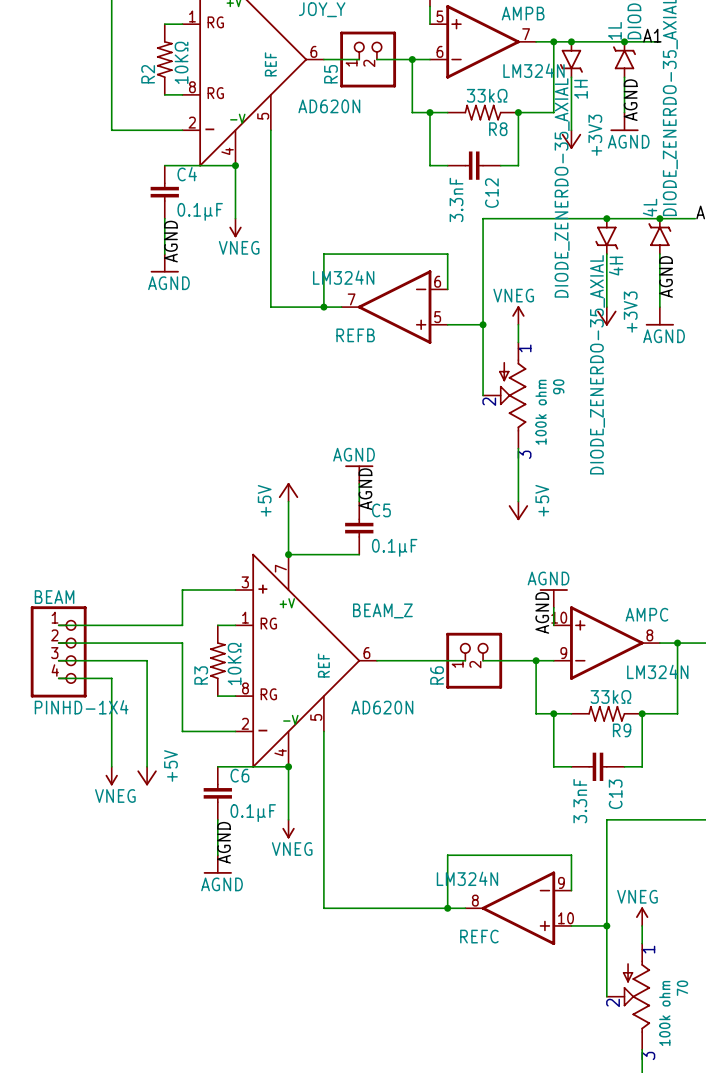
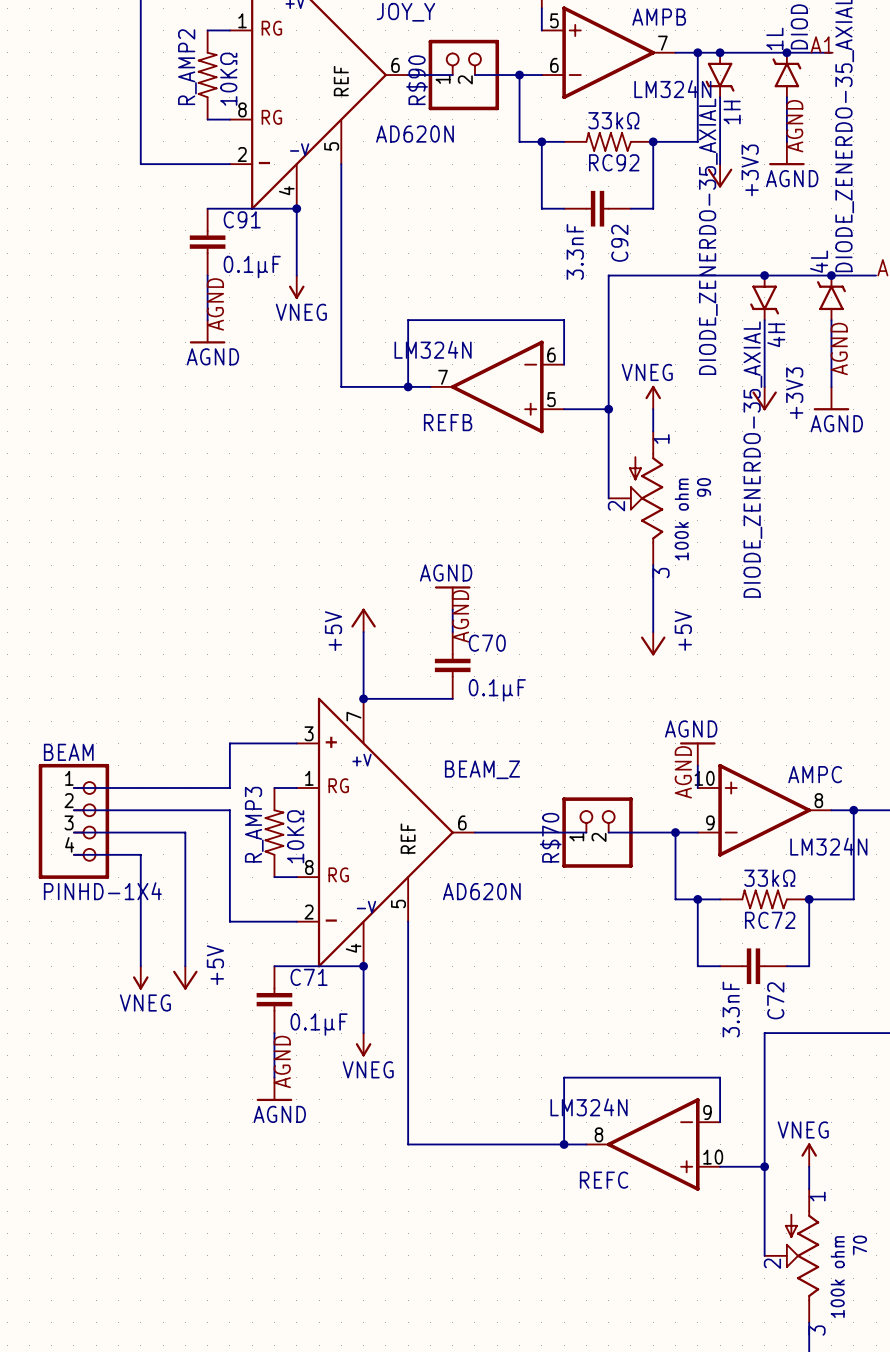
R2 name: R2 (148, 74) -> R_AMP2 (187, 67)
R5 name: R5 (330, 74) -> R$90 (417, 80)
R8 name: R8 (498, 129) -> RC92 (614, 162)
C4 name: C4 (187, 174) -> C91 (242, 219)
C12 name: C12 (491, 193) -> C92 (619, 243)
C5 name: C5 (381, 510) -> C70 (487, 643)
R3 name: R3 (201, 675) -> R_AMP3 (254, 824)
R6 name: R6 (437, 675) -> R$70 (550, 837)
R9 name: R9 (622, 730) -> RC72 (770, 920)
C6 name: C6 (239, 775) -> C71 (309, 977)
C13 name: C13 (615, 794) -> C72 (775, 1000)

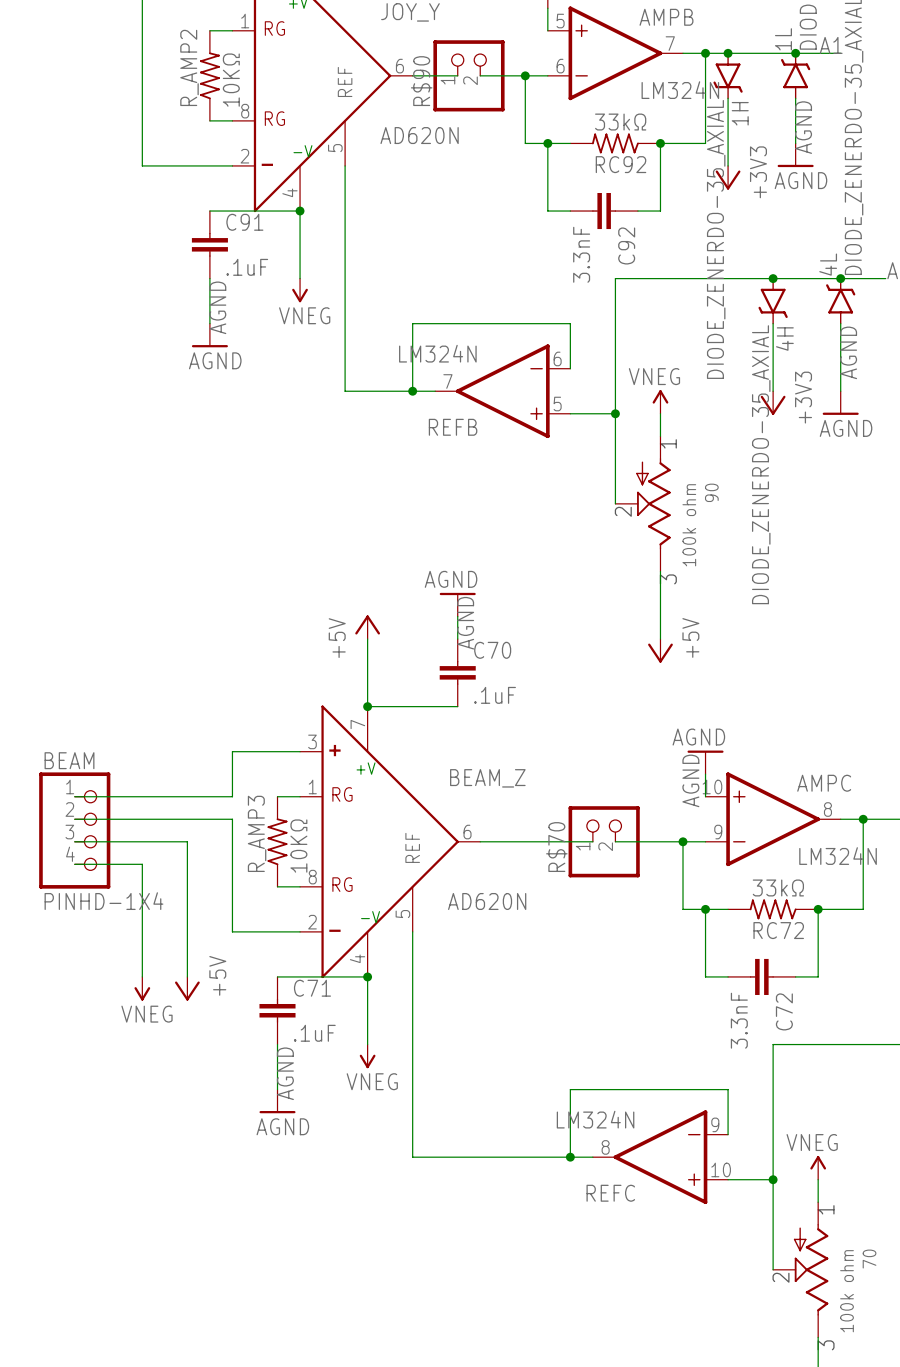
C91 value: 0.1µF (252, 267) -> .1uF (247, 267)
C70 value: 0.1µF (497, 690) -> .1uF (495, 695)
C71 value: 0.1µF (319, 1024) -> .1uF (314, 1033)

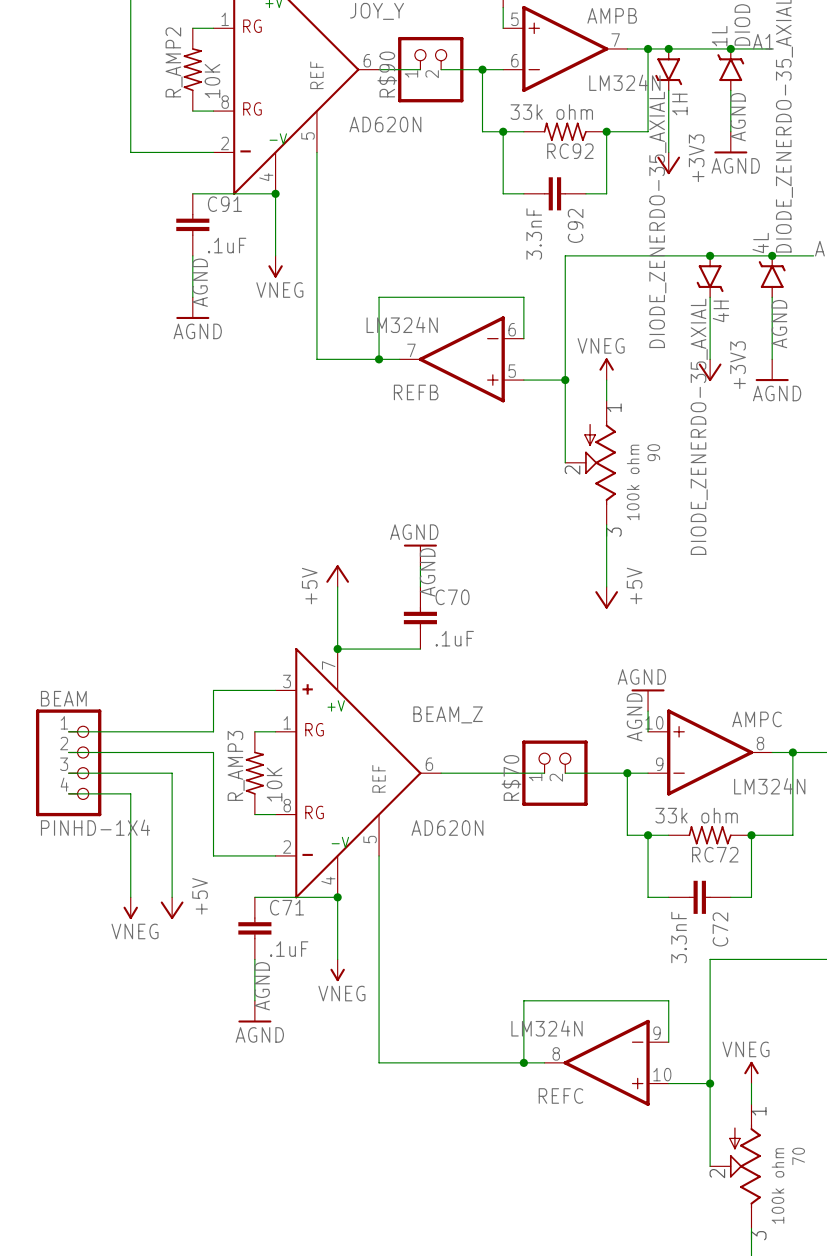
R_AMP2 value: 10KΩ (231, 80) -> 10K (212, 81)
RC92 value: 33kΩ (620, 122) -> 33k ohm (551, 112)
R_AMP3 value: 10KΩ (298, 846) -> 10K (274, 784)
RC72 value: 33kΩ (778, 887) -> 33k ohm (696, 815)

